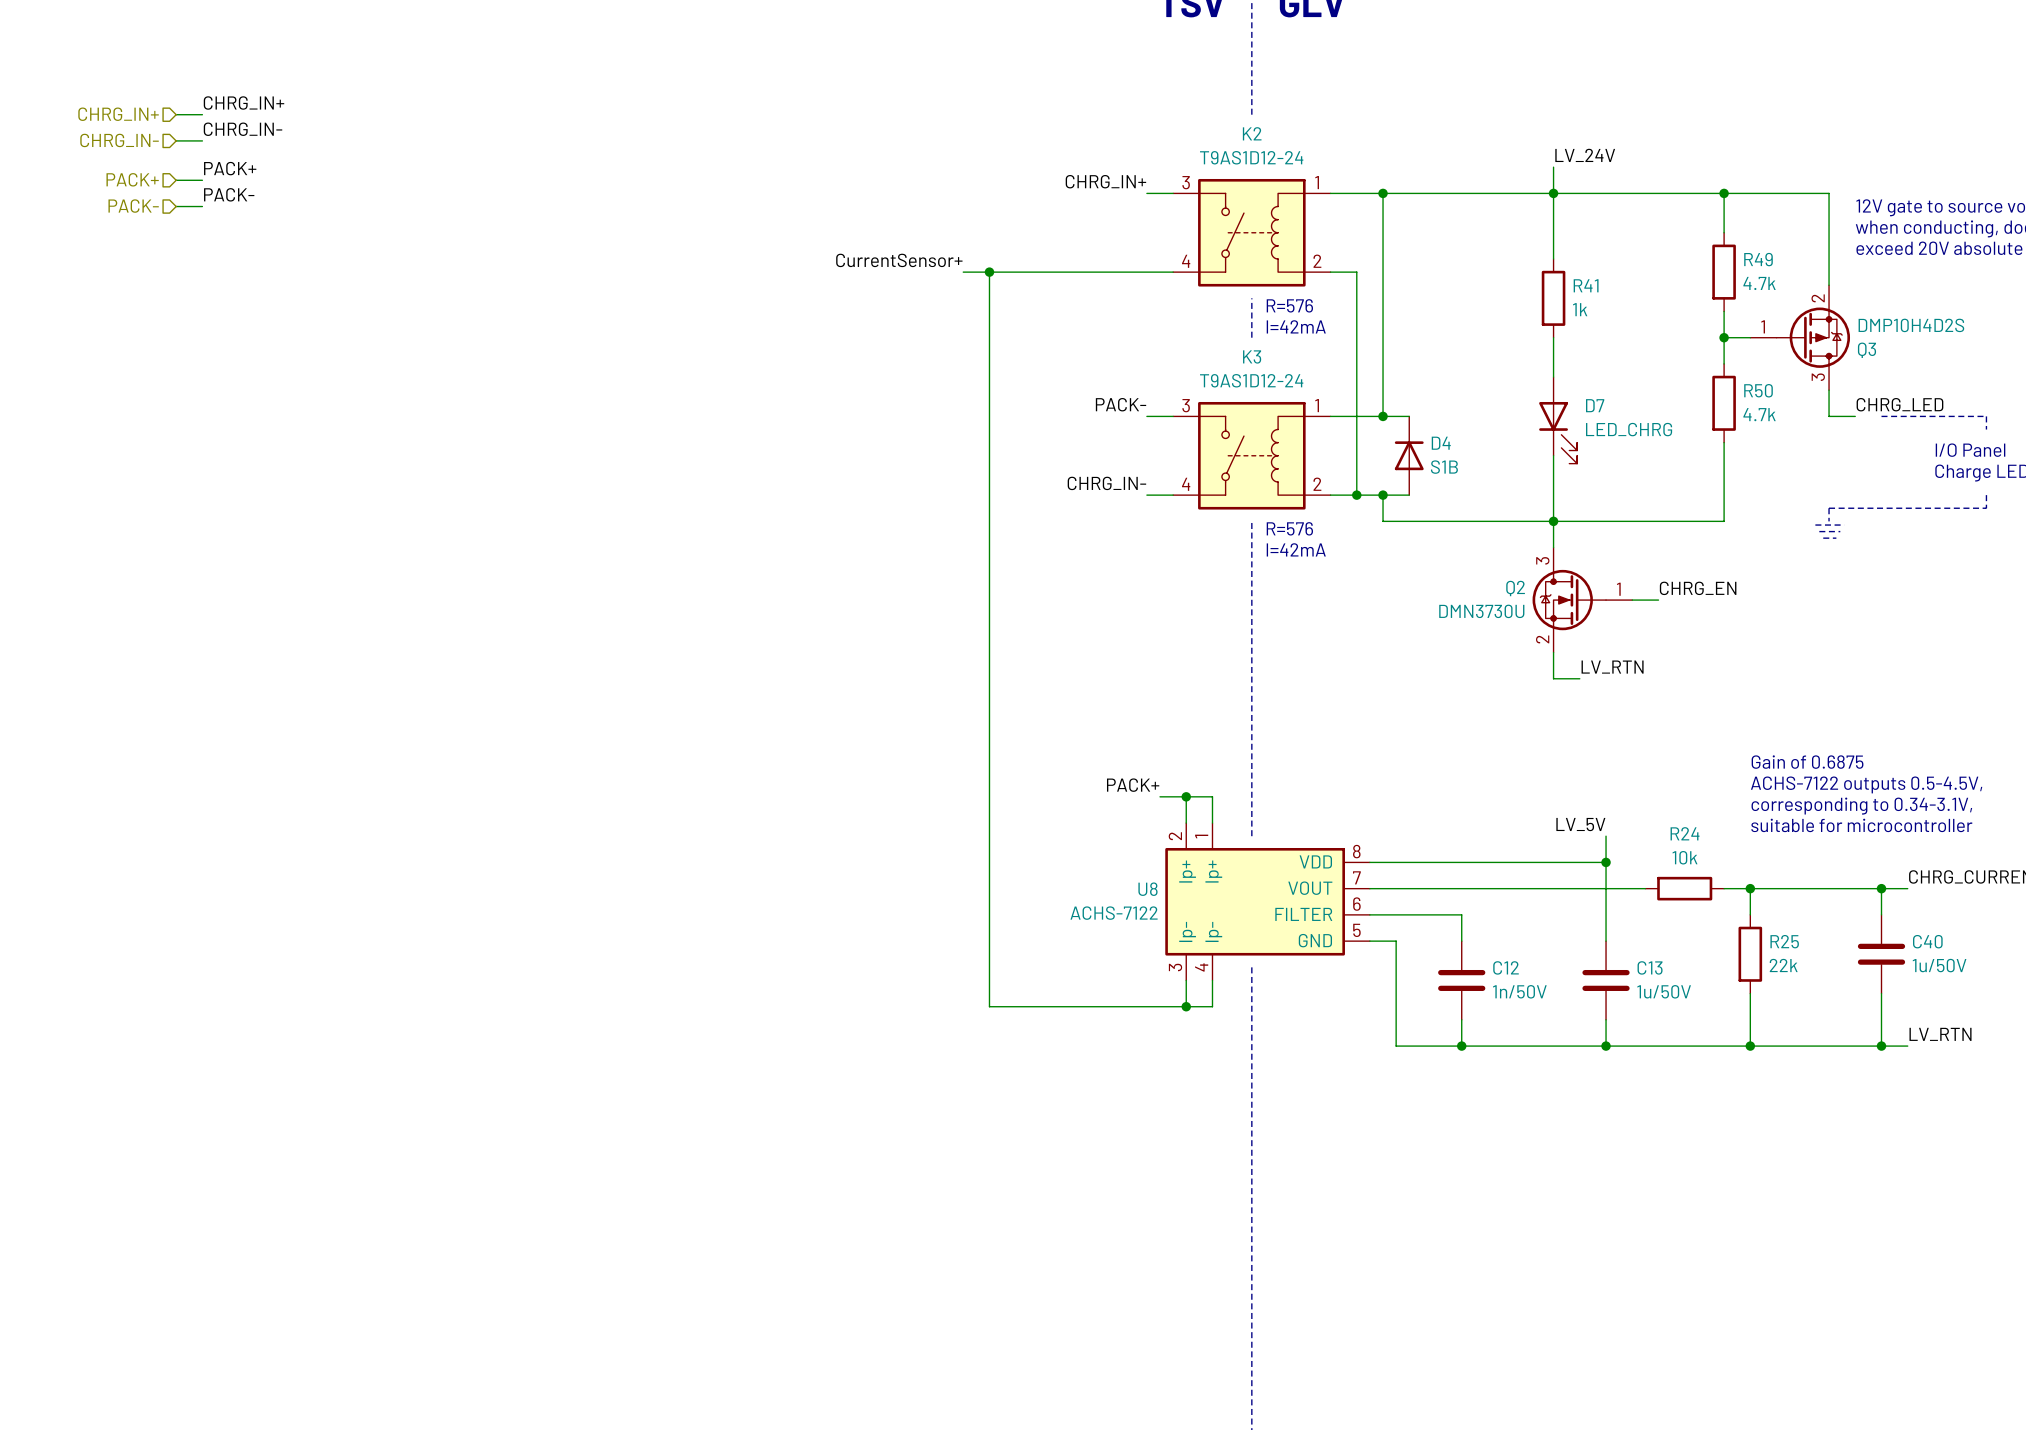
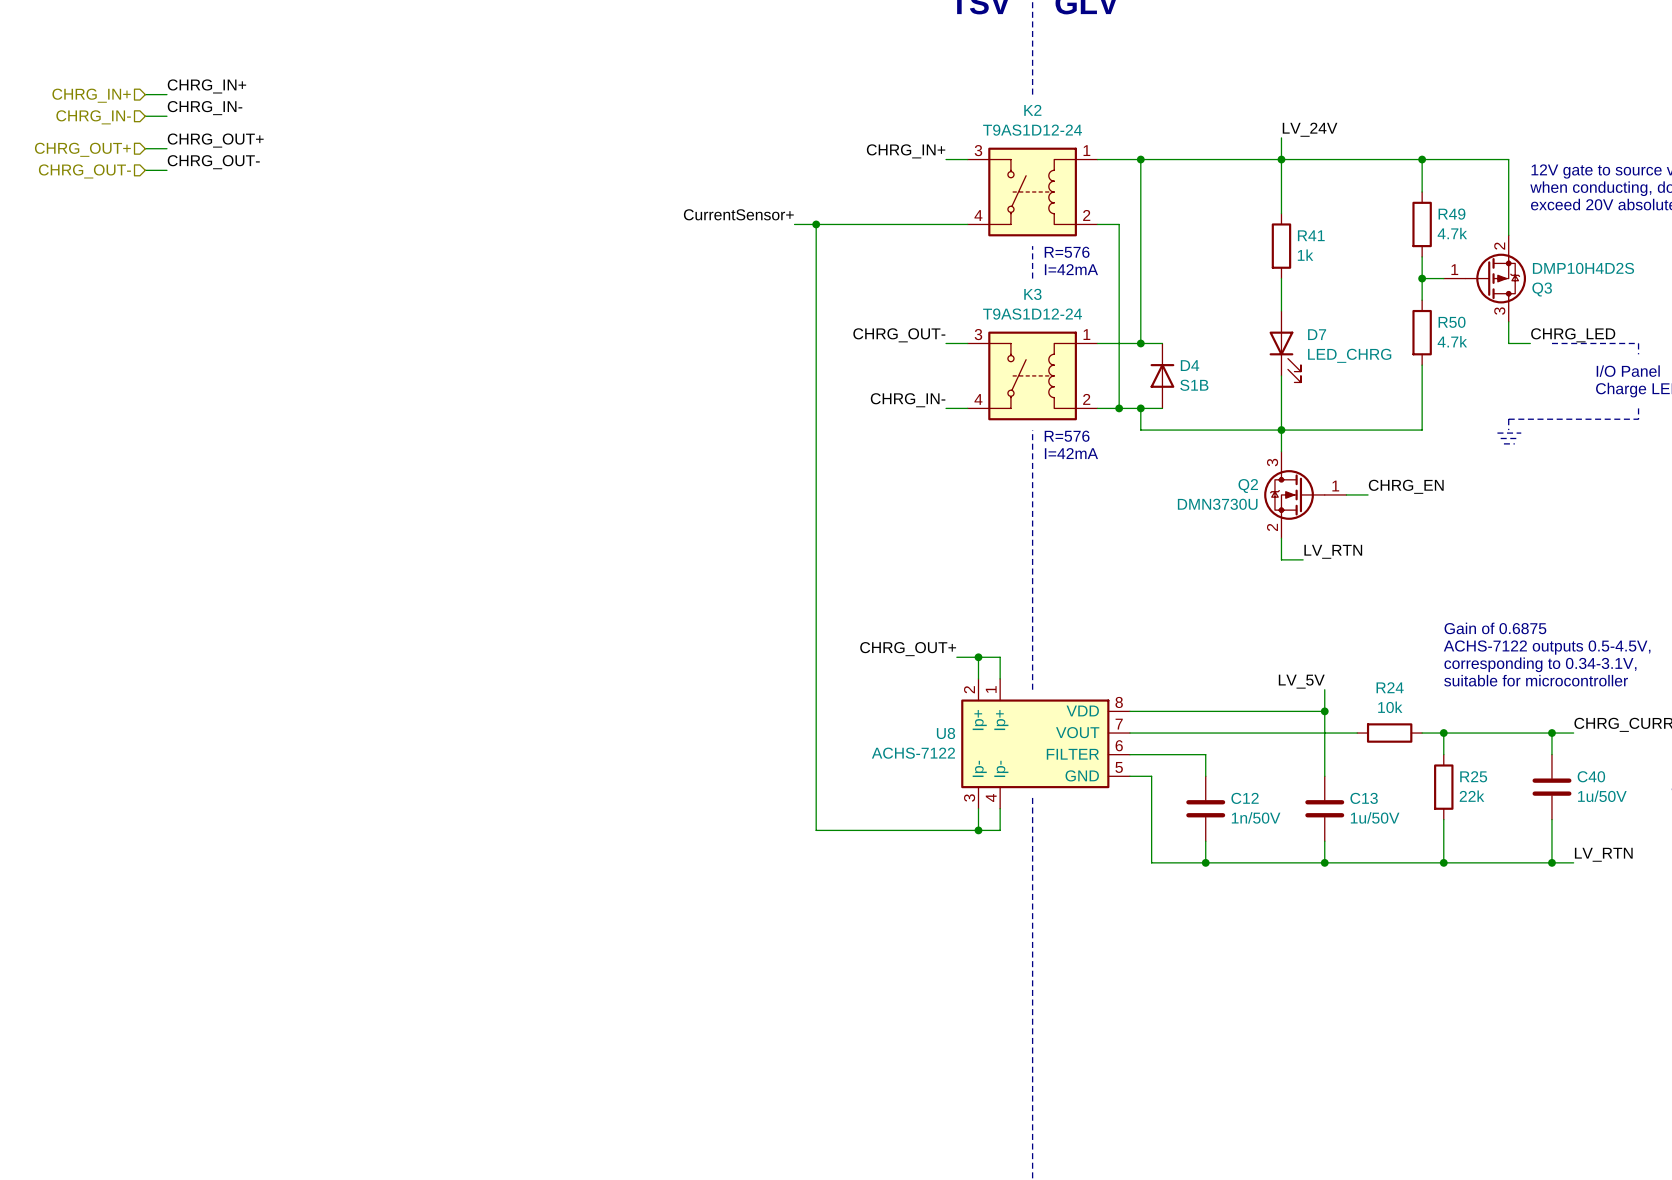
label: PACK+ (230, 168) -> CHRG_OUT+ (215, 140)
hierarchical label: PACK+ (132, 179) -> CHRG_OUT+ (82, 149)
label: PACK- (229, 194) -> CHRG_OUT- (213, 162)
hierarchical label: PACK- (133, 206) -> CHRG_OUT- (84, 171)
label: PACK- (1121, 404) -> CHRG_OUT- (899, 335)
label: PACK+ (1133, 785) -> CHRG_OUT+ (908, 649)

